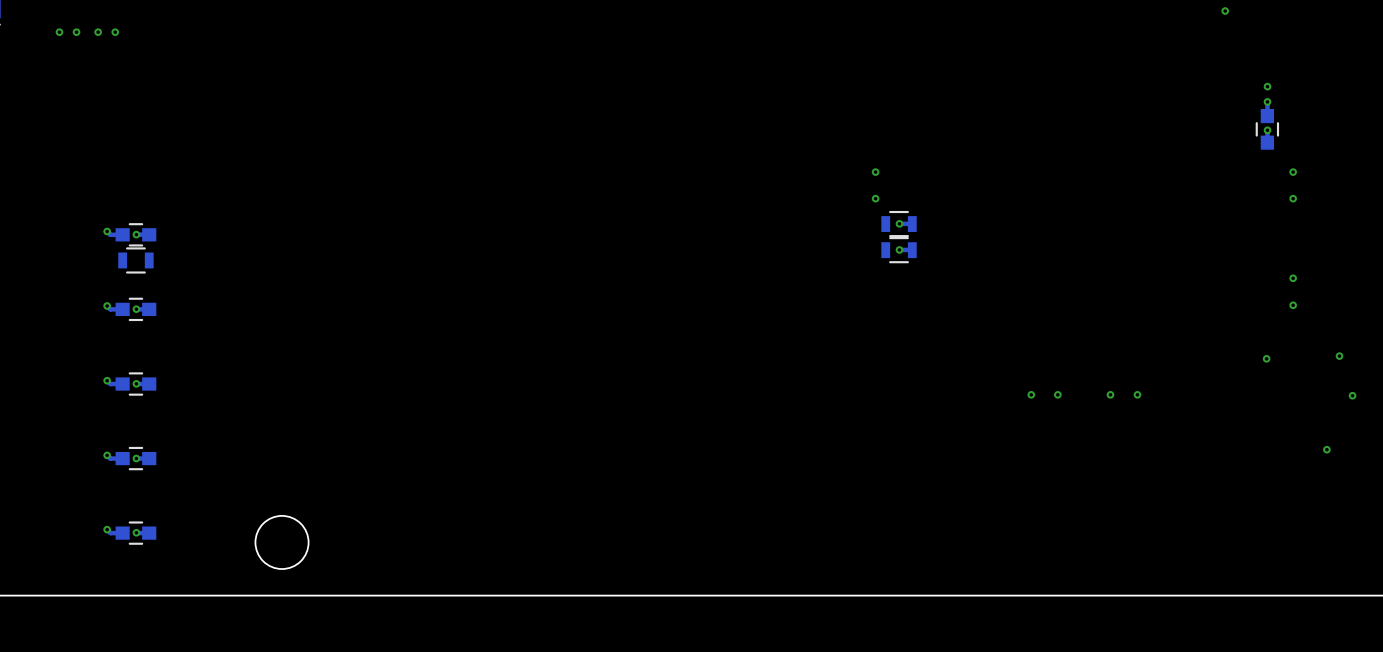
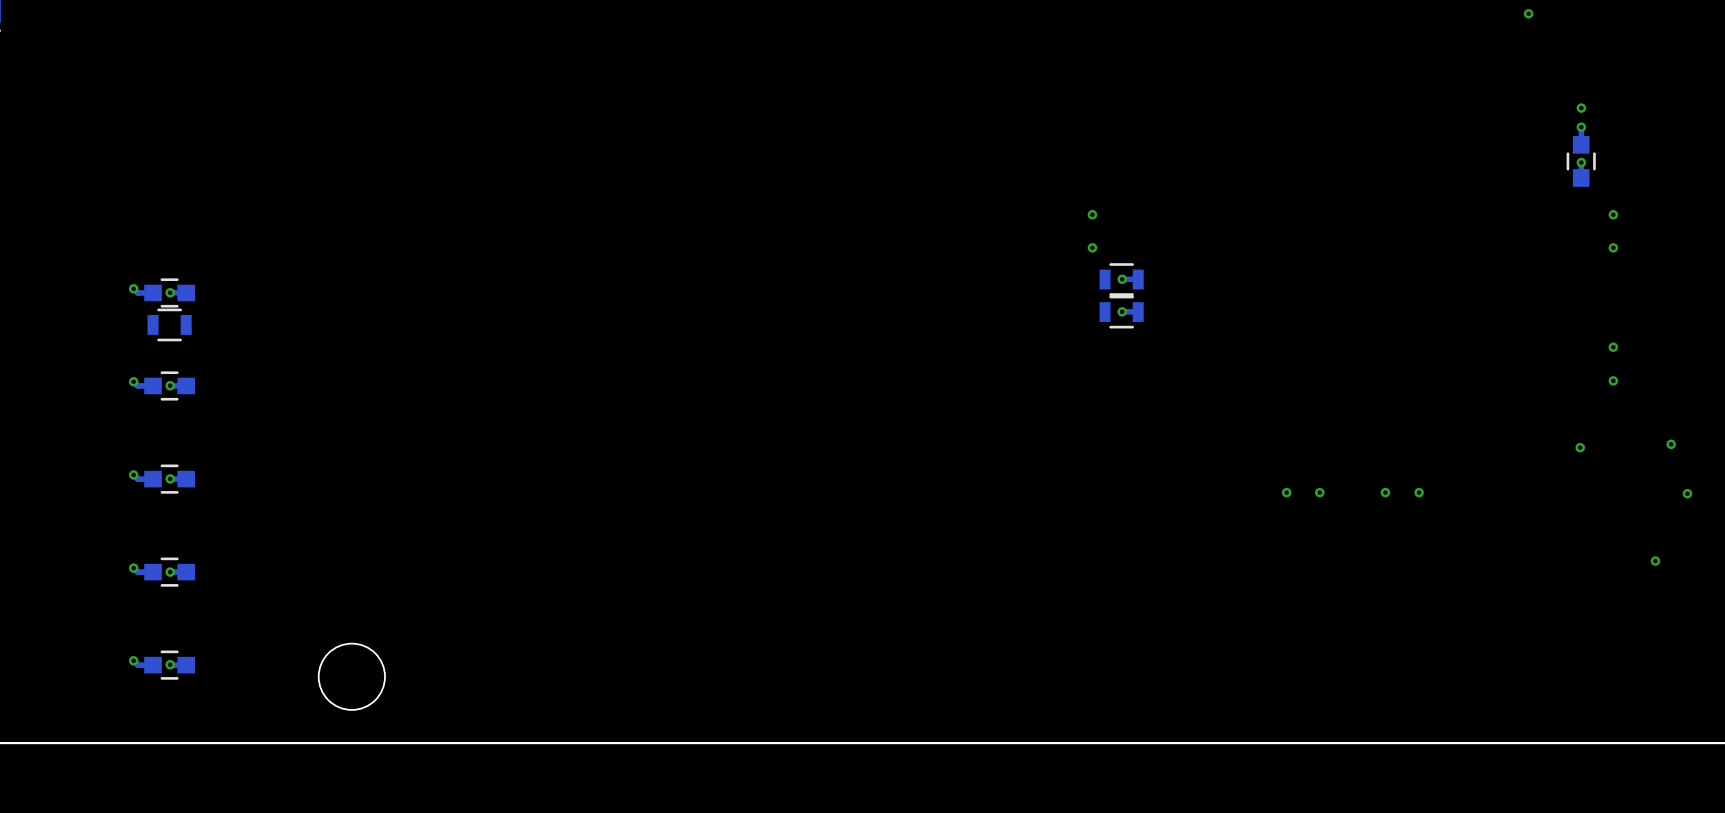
via: (59, 32) -> none
via: (76, 32) -> none
via: (98, 32) -> none
via: (115, 32) -> none

